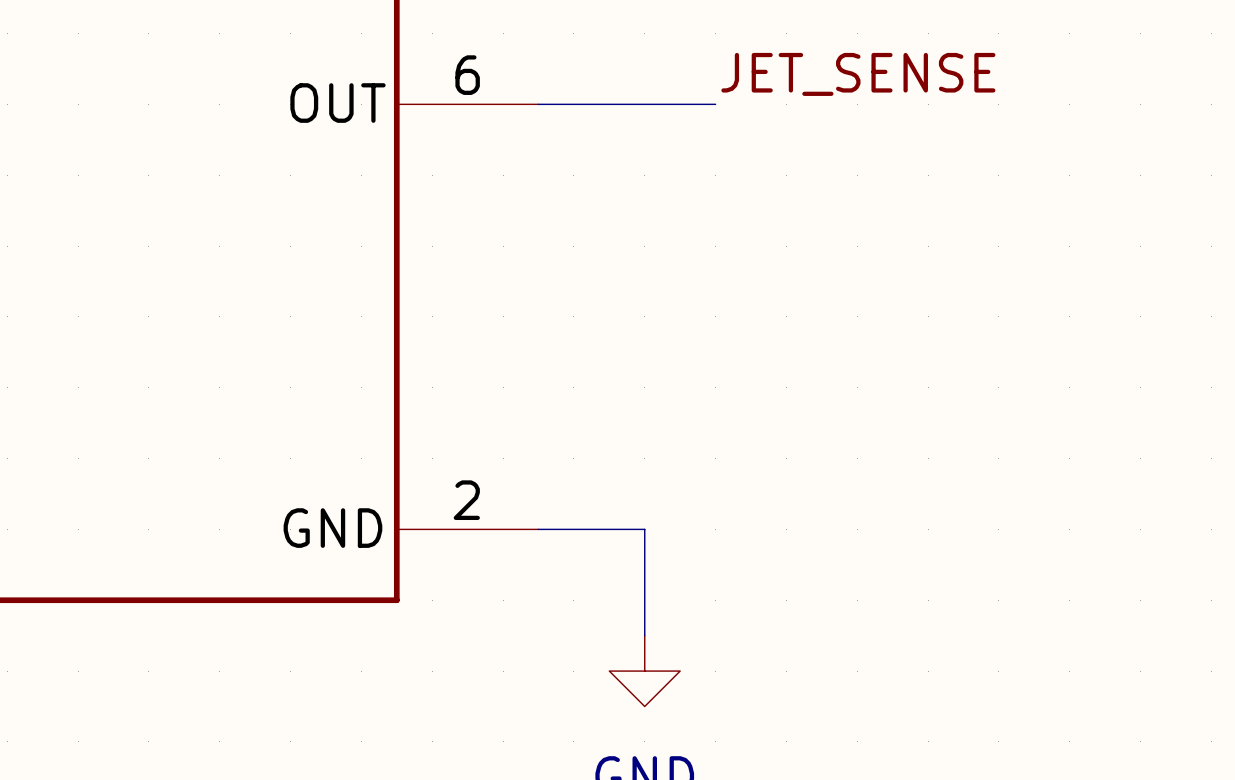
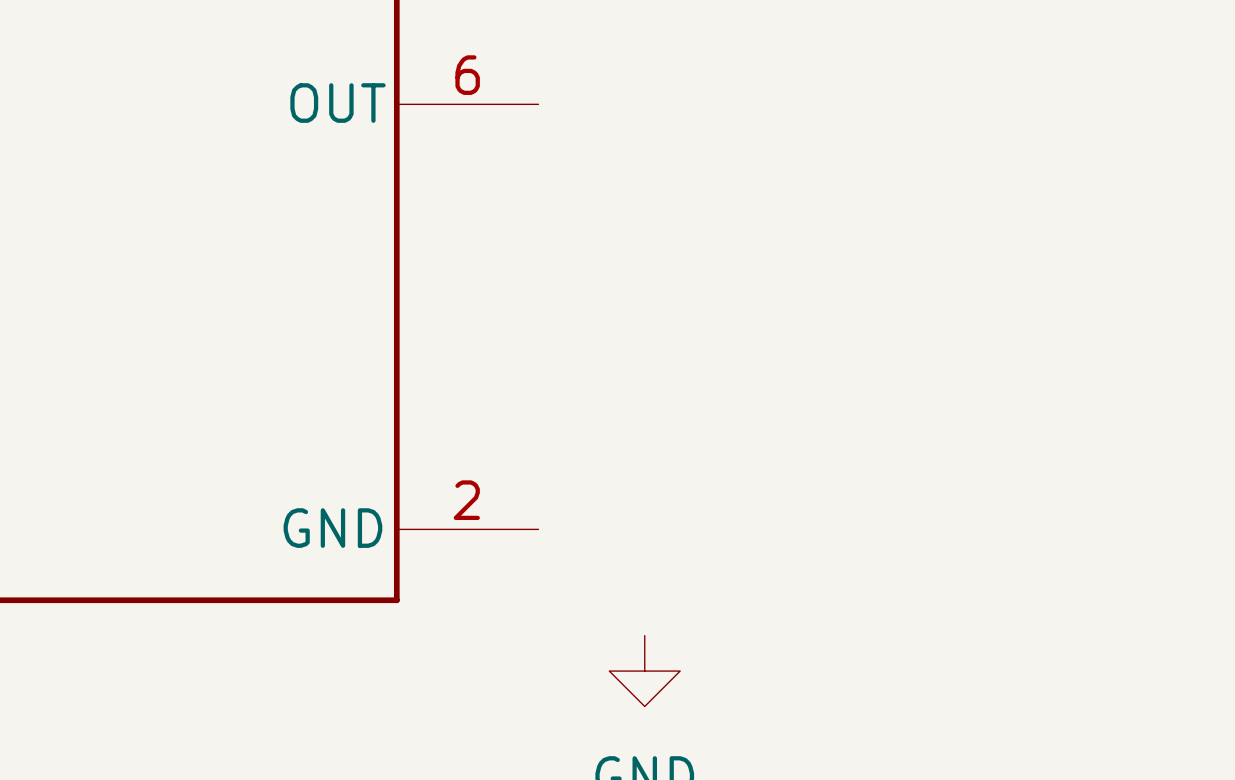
label: JET_SENSE (858, 74) -> none
wire: (538, 104) (715, 104) -> none
wire: (538, 529) (644, 529) (644, 635) -> none

